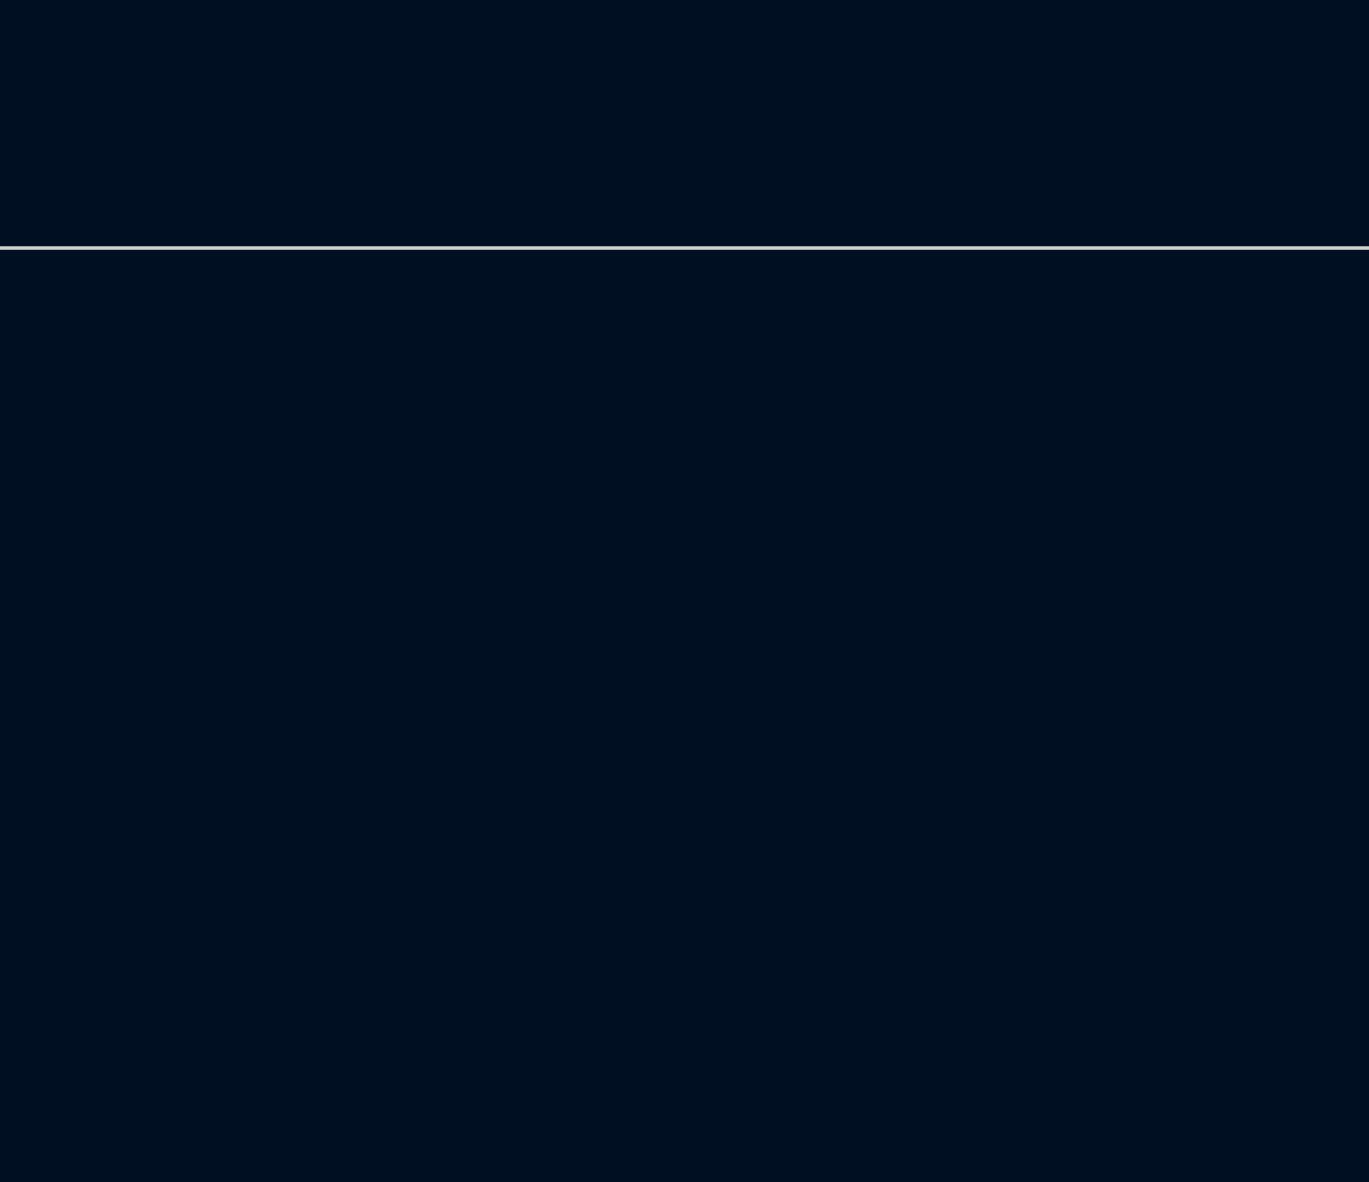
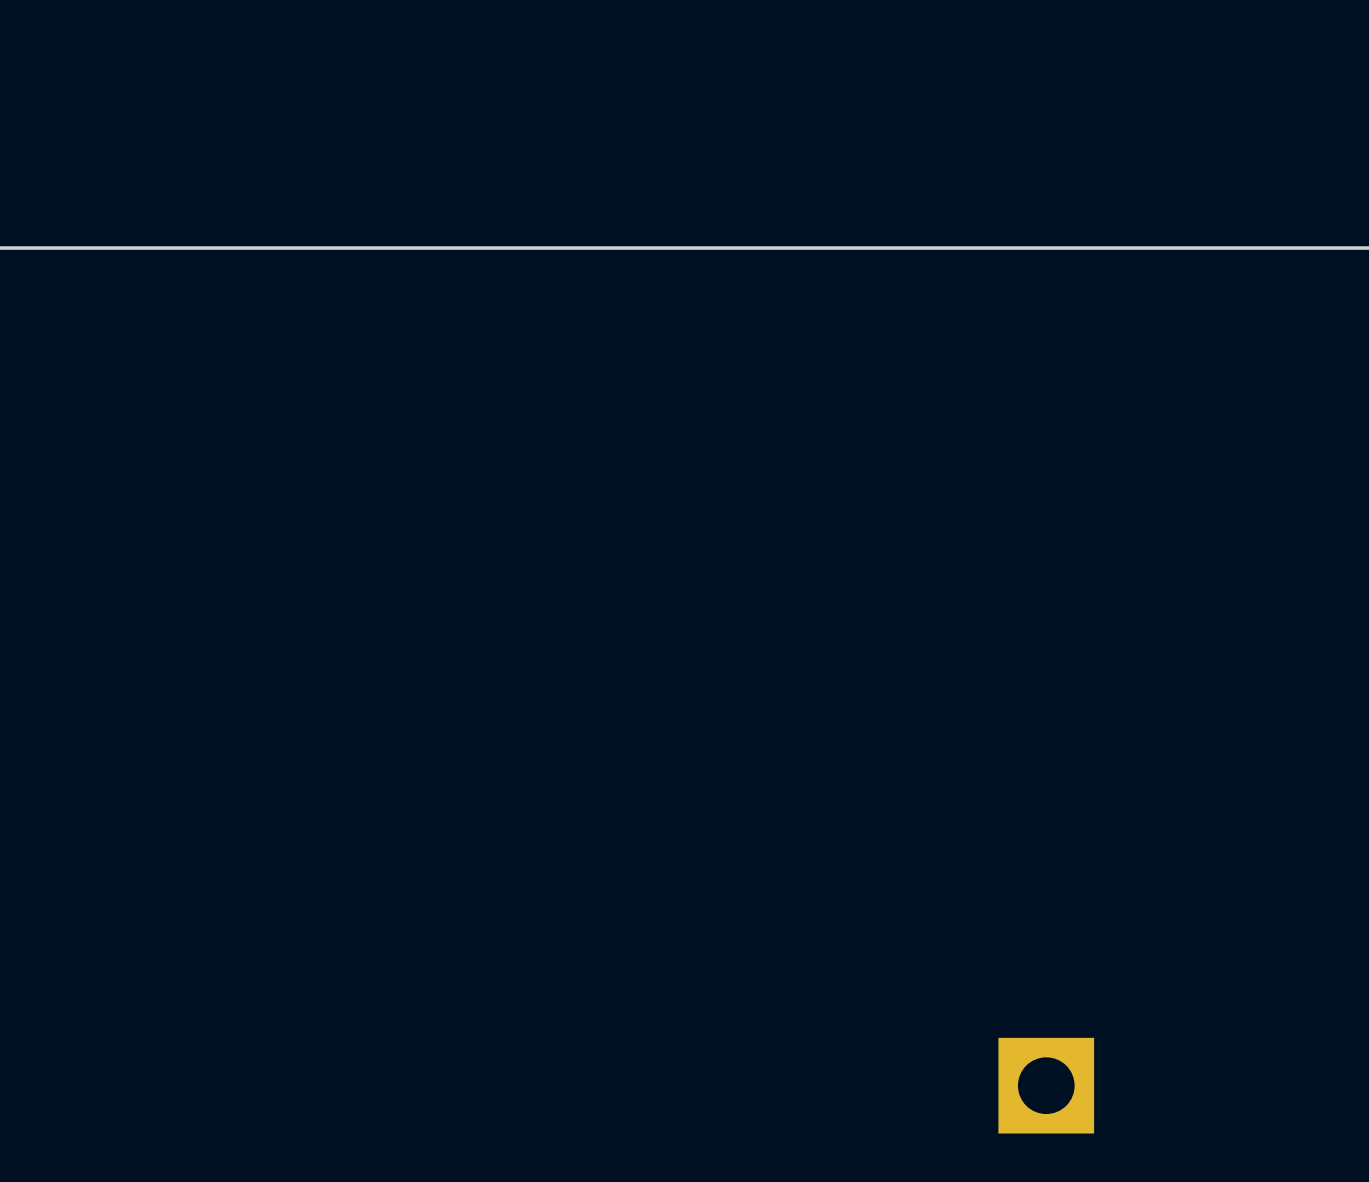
part: none -> (1046, 1085)

